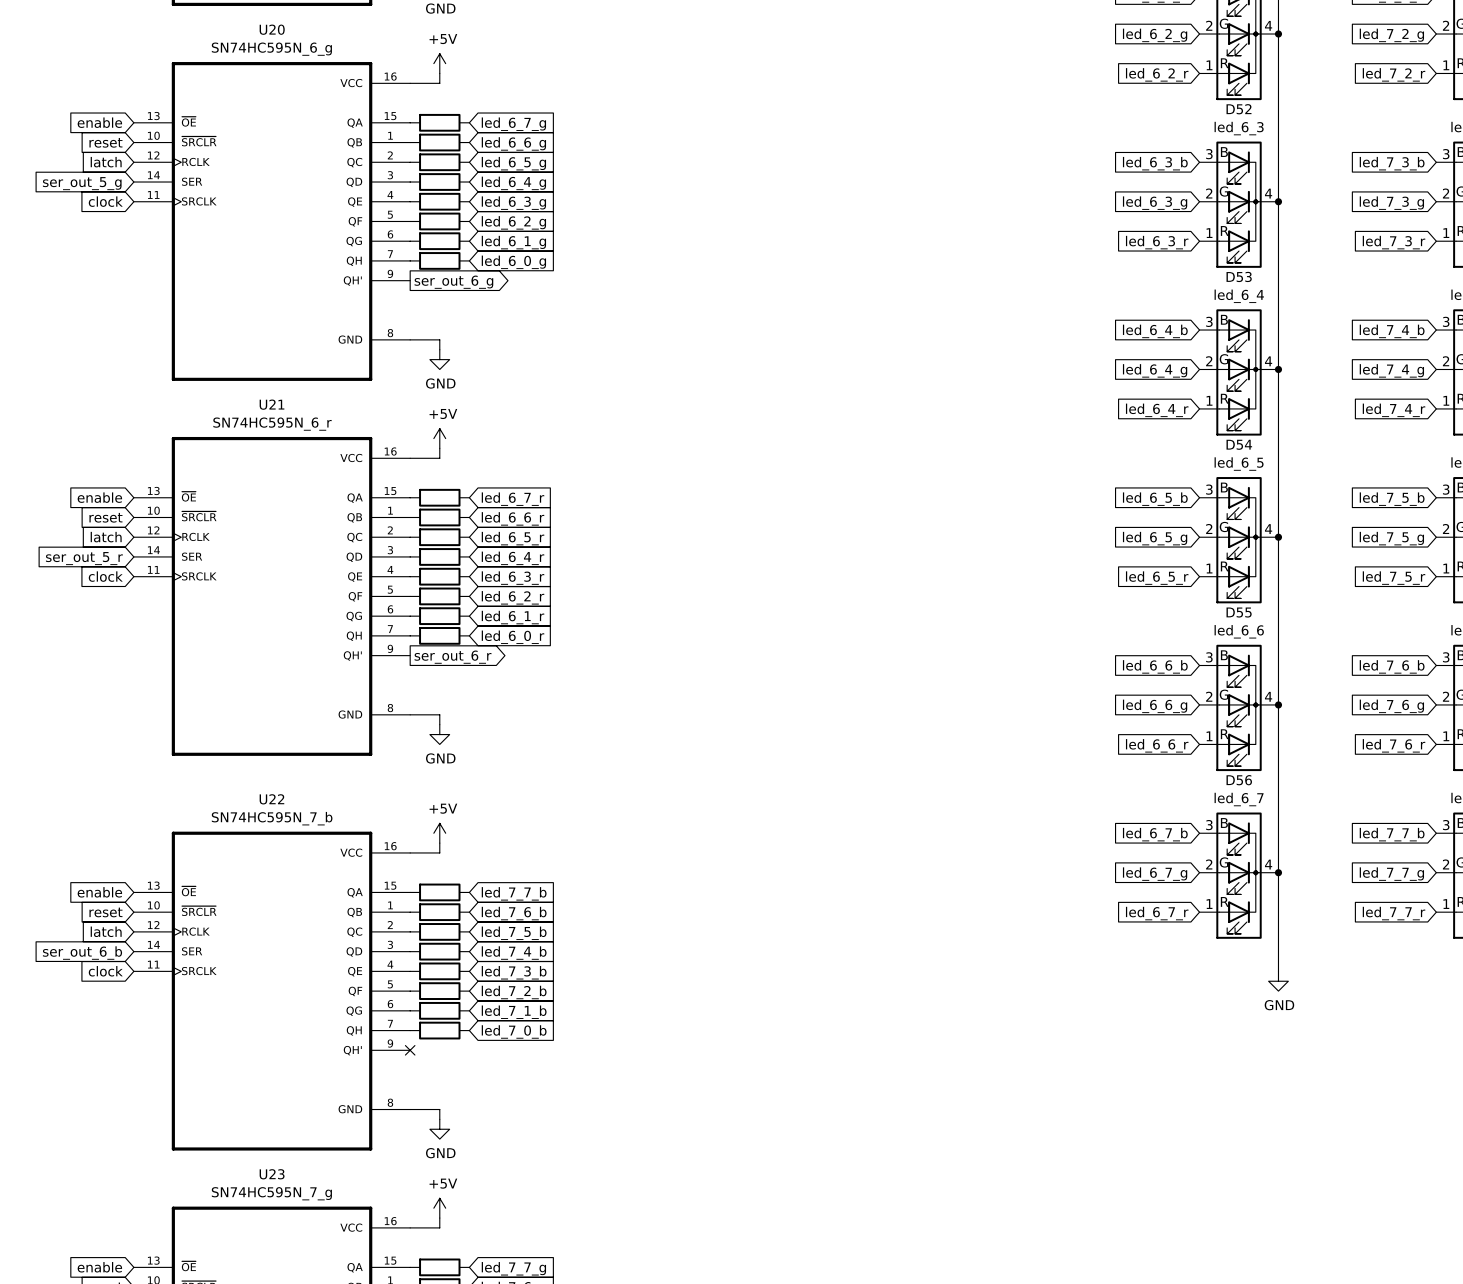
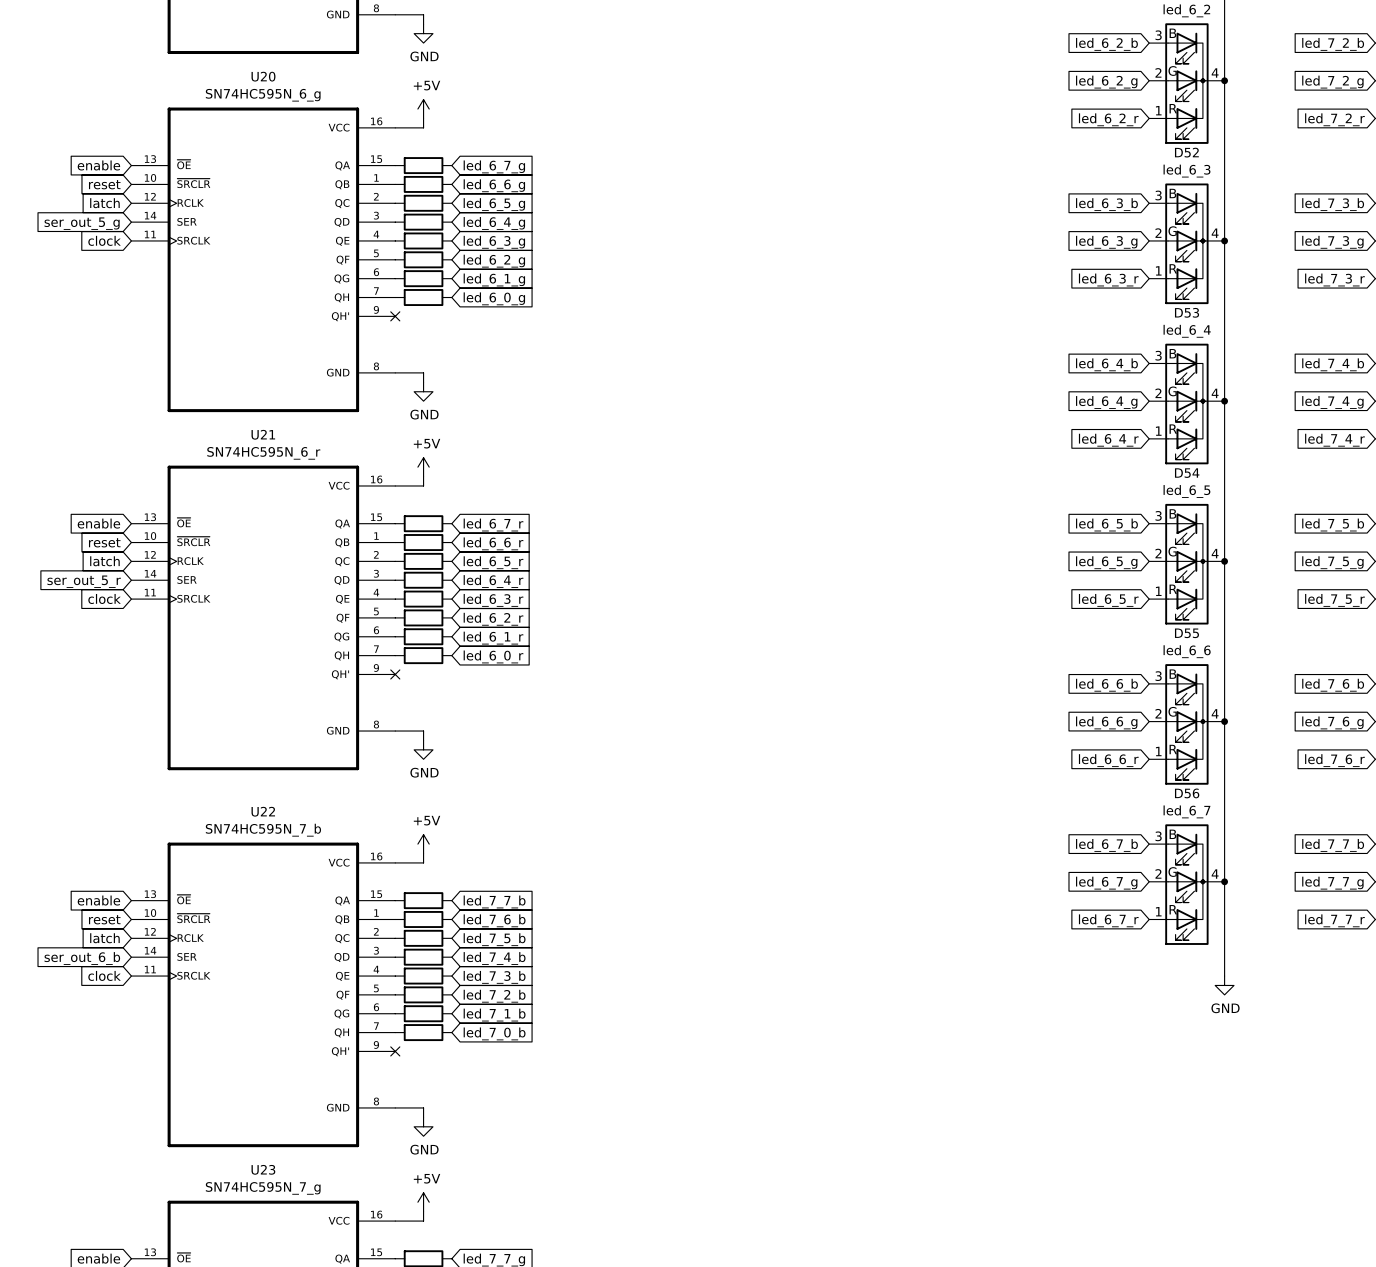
no-connect mark: none -> (395, 316)
global label: ser_out_6_g (453, 282) -> none
no-connect mark: none -> (395, 674)
global label: ser_out_6_r (453, 657) -> none

